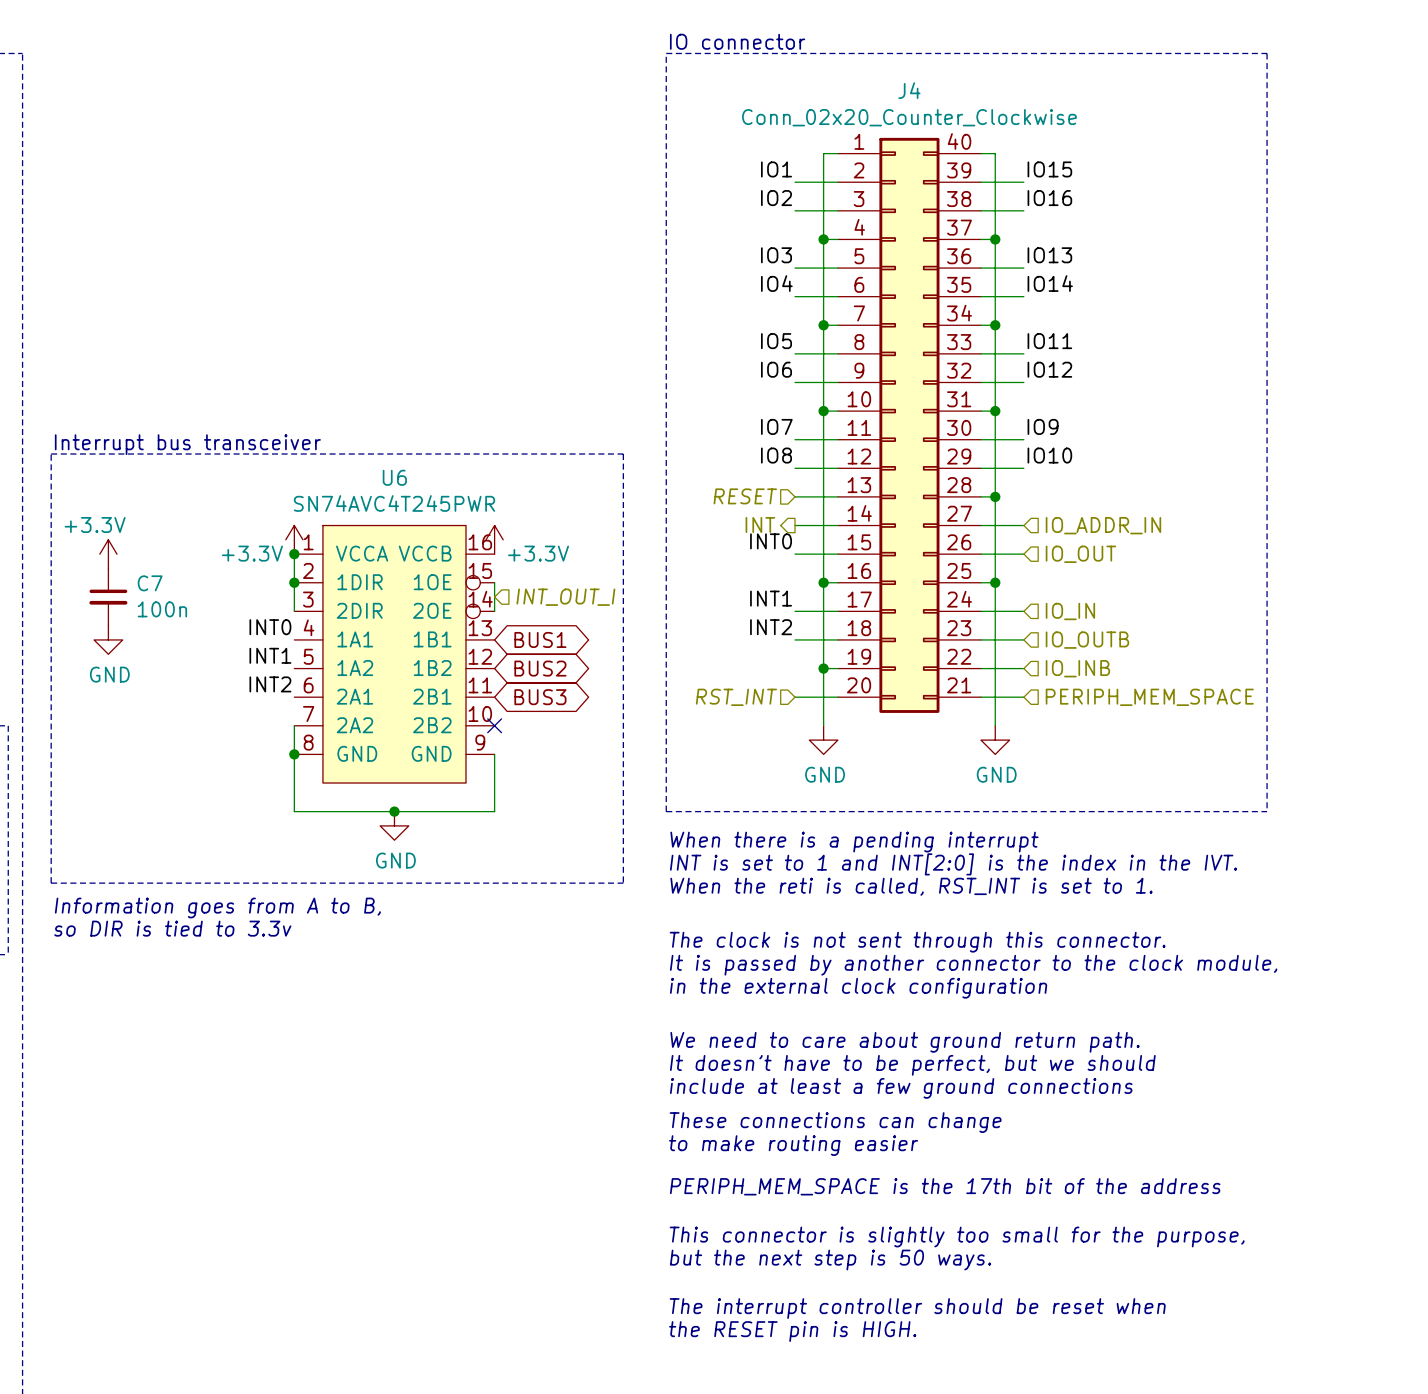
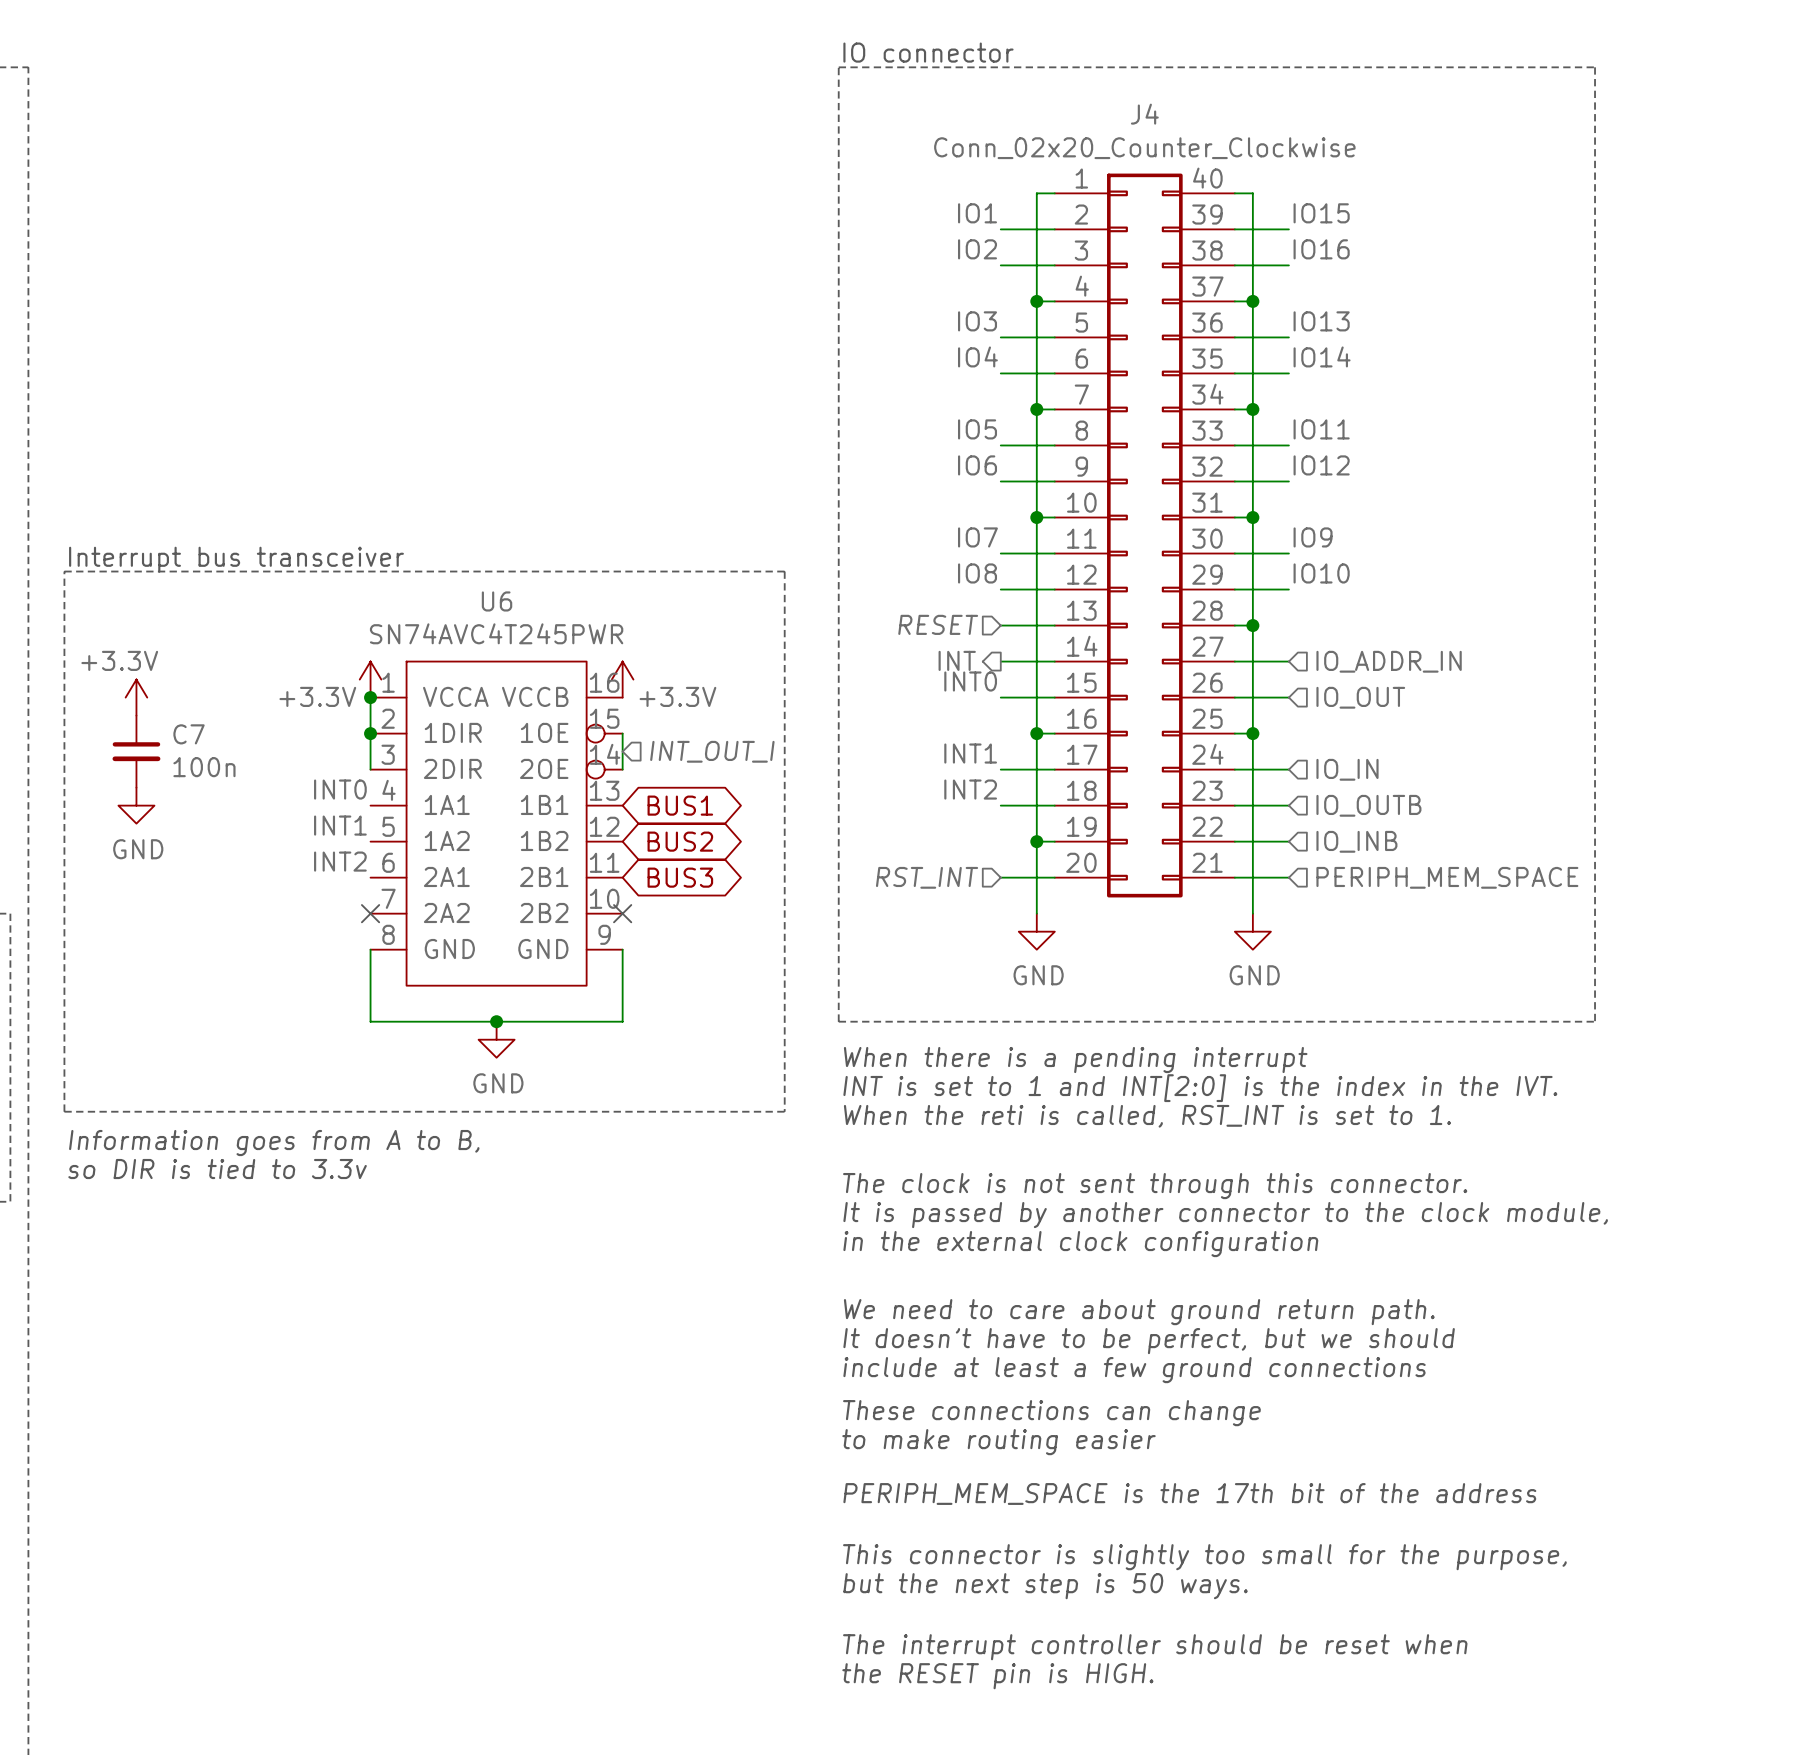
wire: (294, 725) (294, 754) -> none
no-connect mark: none -> (370, 913)
junction: (294, 754) -> none

